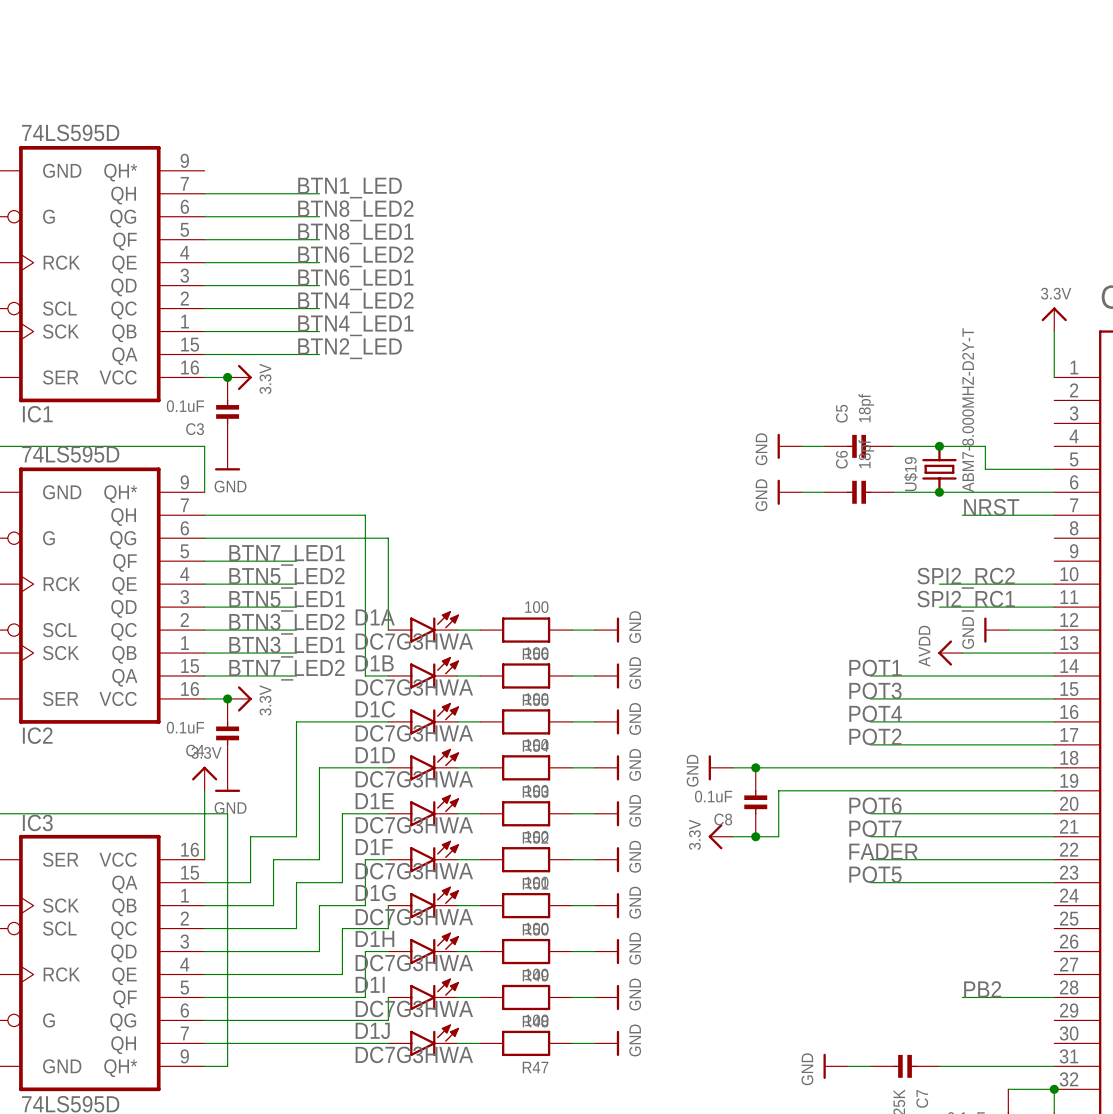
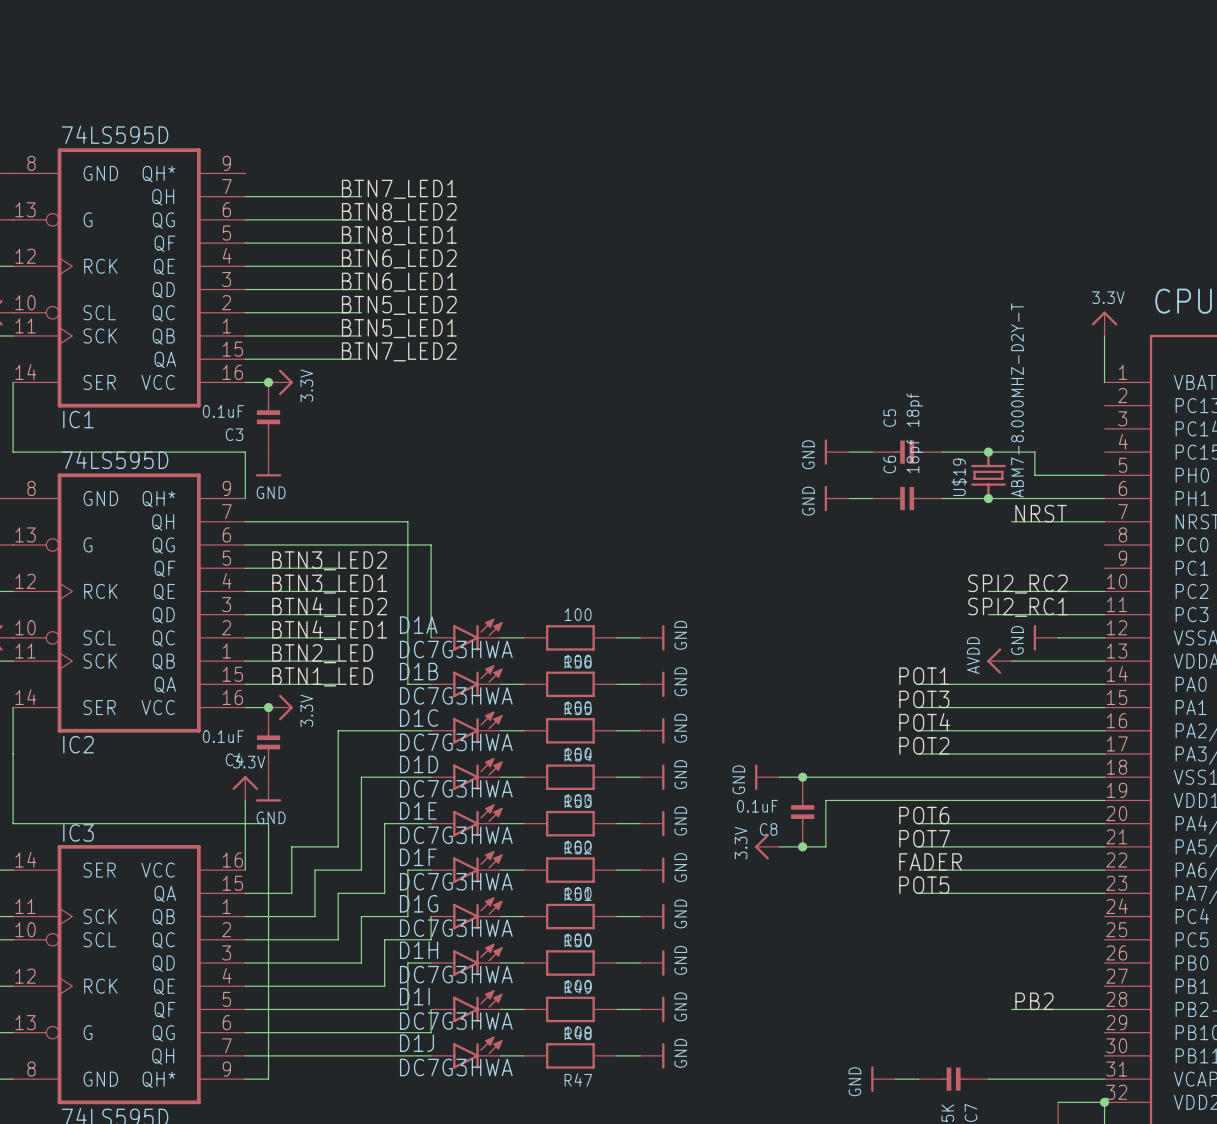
label: BTN1_LED (350, 188) -> BTN7_LED1 (399, 189)
label: BTN4_LED2 (355, 302) -> BTN5_LED2 (399, 305)
label: BTN4_LED1 (355, 325) -> BTN5_LED1 (399, 328)
label: BTN2_LED (350, 348) -> BTN7_LED2 (399, 351)
label: BTN7_LED1 (286, 555) -> BTN3_LED2 (329, 560)
label: BTN5_LED2 (286, 578) -> BTN3_LED1 (329, 584)
label: BTN5_LED1 (286, 601) -> BTN4_LED2 (329, 606)
label: BTN3_LED2 (286, 624) -> BTN4_LED1 (329, 630)
label: BTN3_LED1 (286, 647) -> BTN2_LED (322, 653)
label: BTN7_LED2 (286, 670) -> BTN1_LED (322, 676)

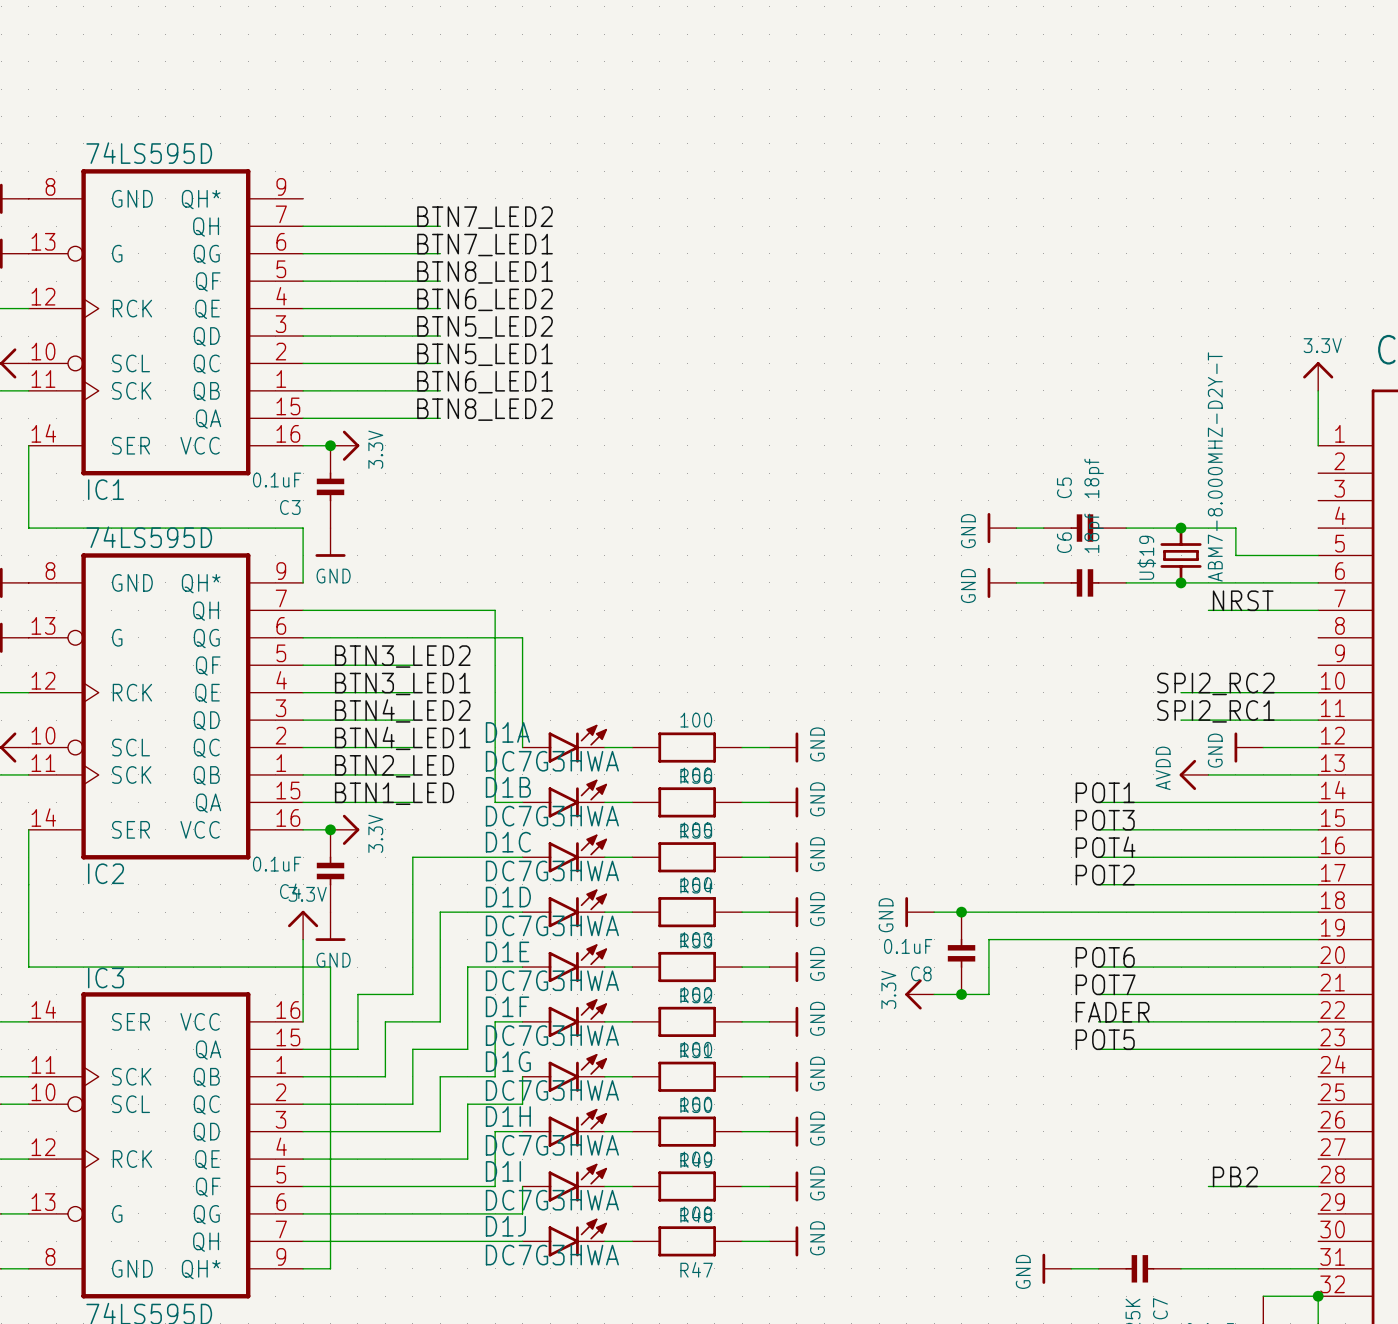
label: BTN7_LED1 (399, 189) -> BTN7_LED2 (485, 217)
label: BTN8_LED2 (399, 212) -> BTN7_LED1 (485, 245)
label: BTN6_LED1 (399, 282) -> BTN5_LED2 (485, 327)
label: BTN5_LED2 (399, 305) -> BTN5_LED1 (485, 354)
label: BTN5_LED1 (399, 328) -> BTN6_LED1 (485, 382)
label: BTN7_LED2 (399, 351) -> BTN8_LED2 (485, 409)

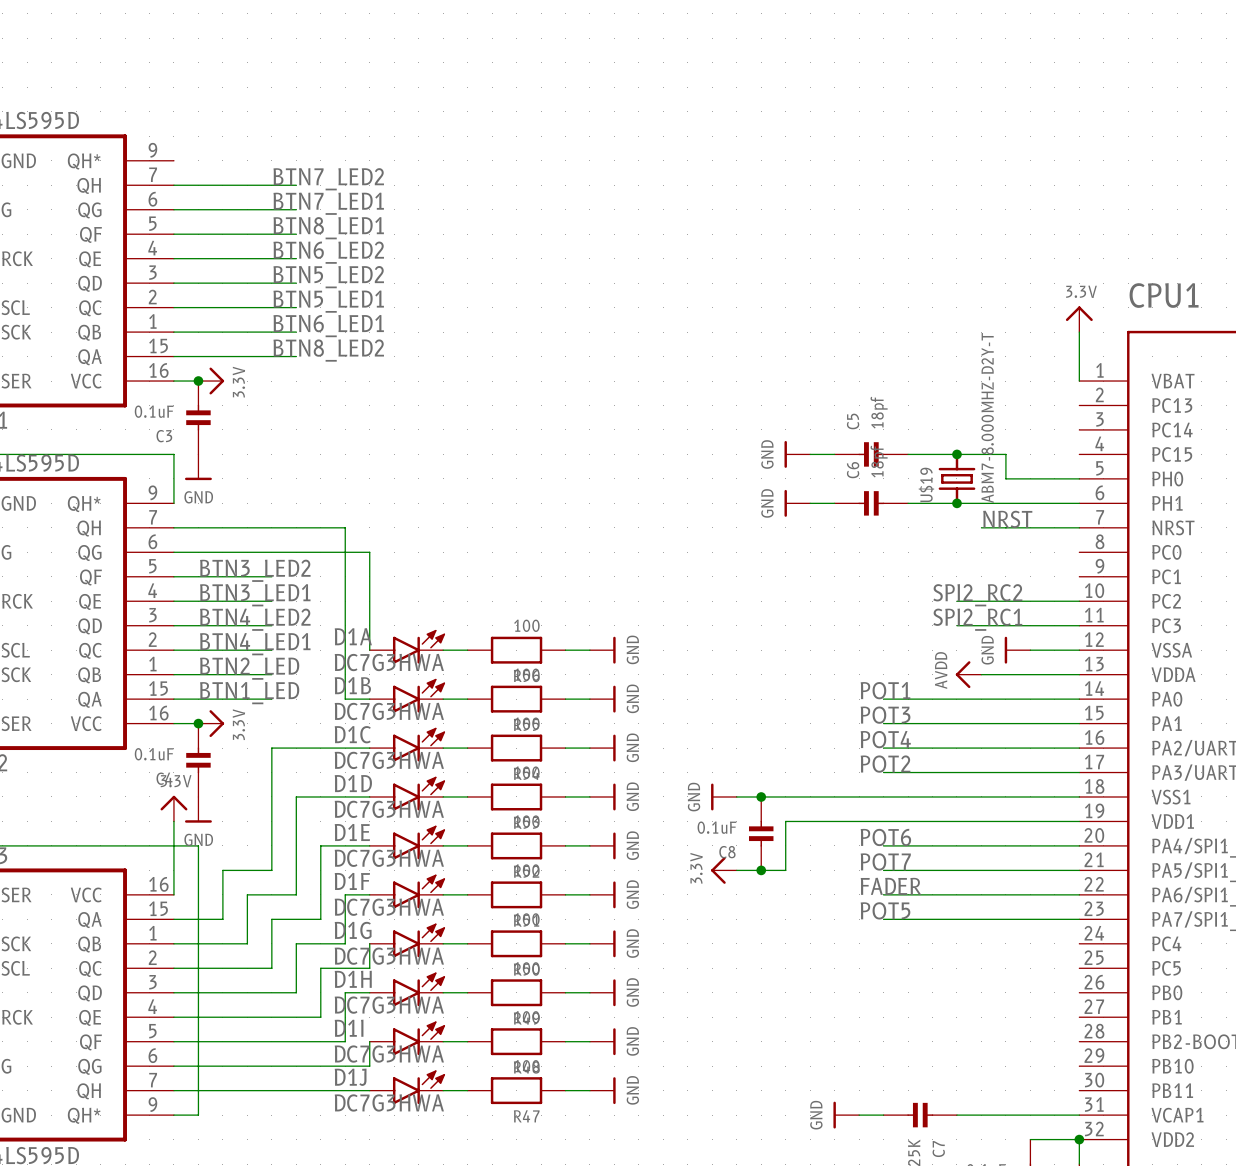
label: PB2 (1235, 1176) -> none
wire: (1208, 1186) (1318, 1186) -> none

